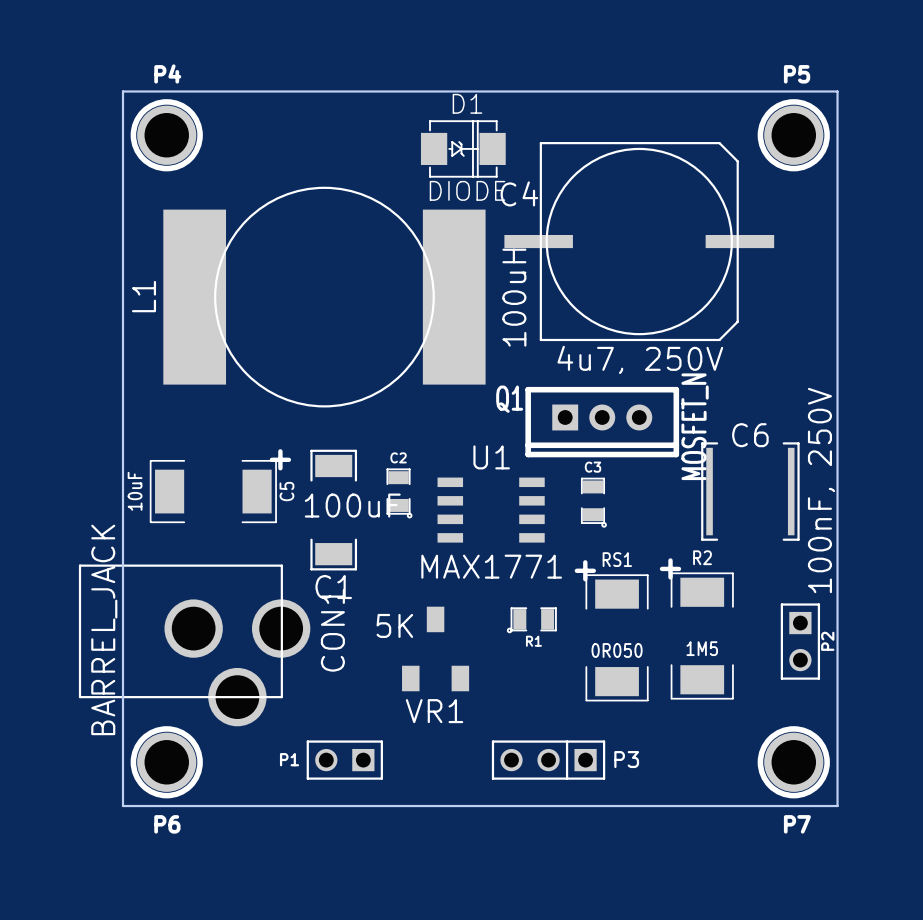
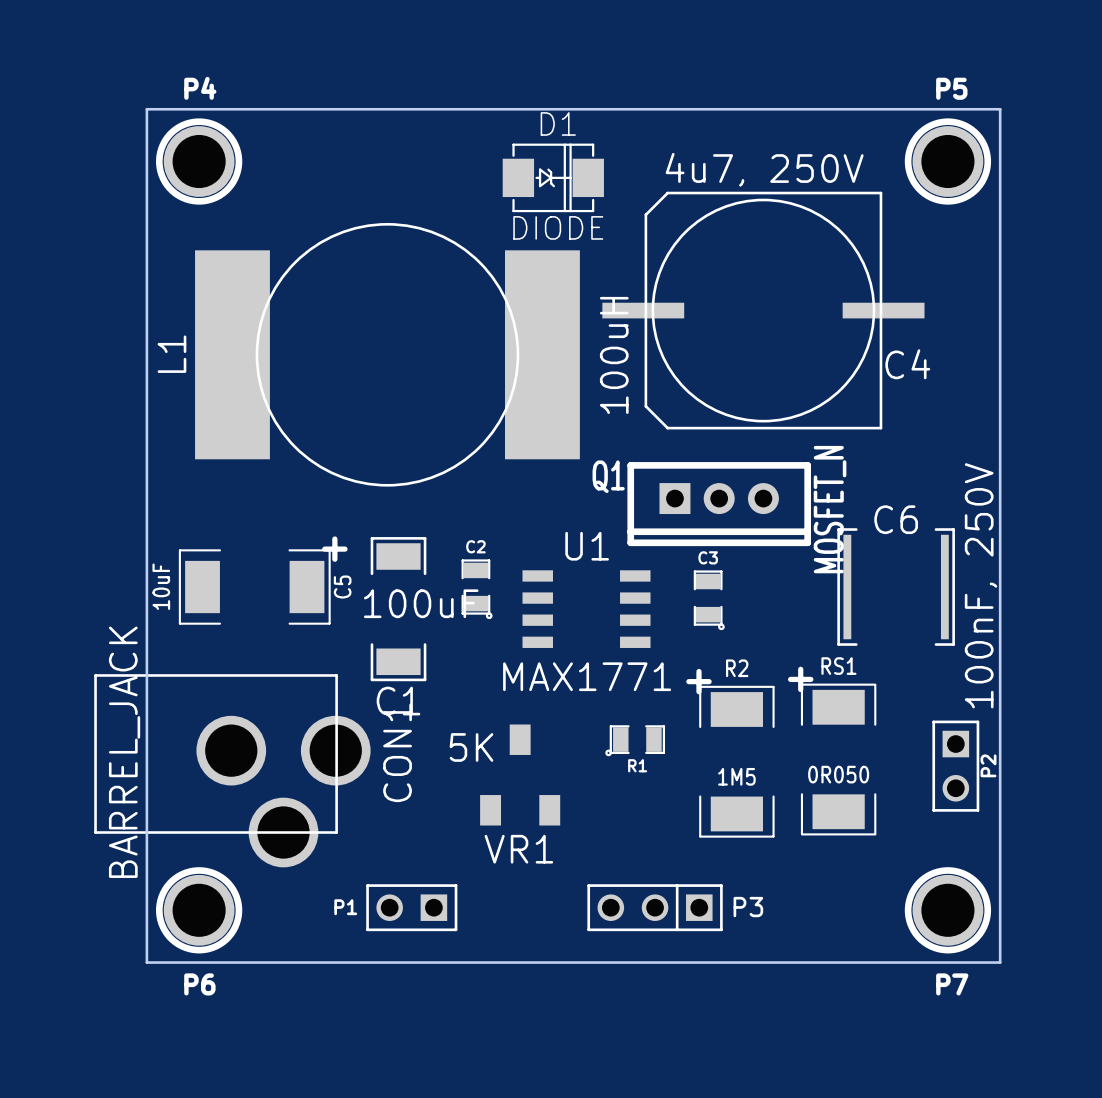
C4 rotation: 0° (639, 241) -> 180° (763, 310)
R2 name: R2 (702, 557) -> RS1 (838, 666)
RS1 name: RS1 (617, 559) -> R2 (737, 668)
R2 value: 1M5 (702, 648) -> 0R050 (838, 774)
RS1 value: 0R050 (617, 650) -> 1M5 (736, 776)

